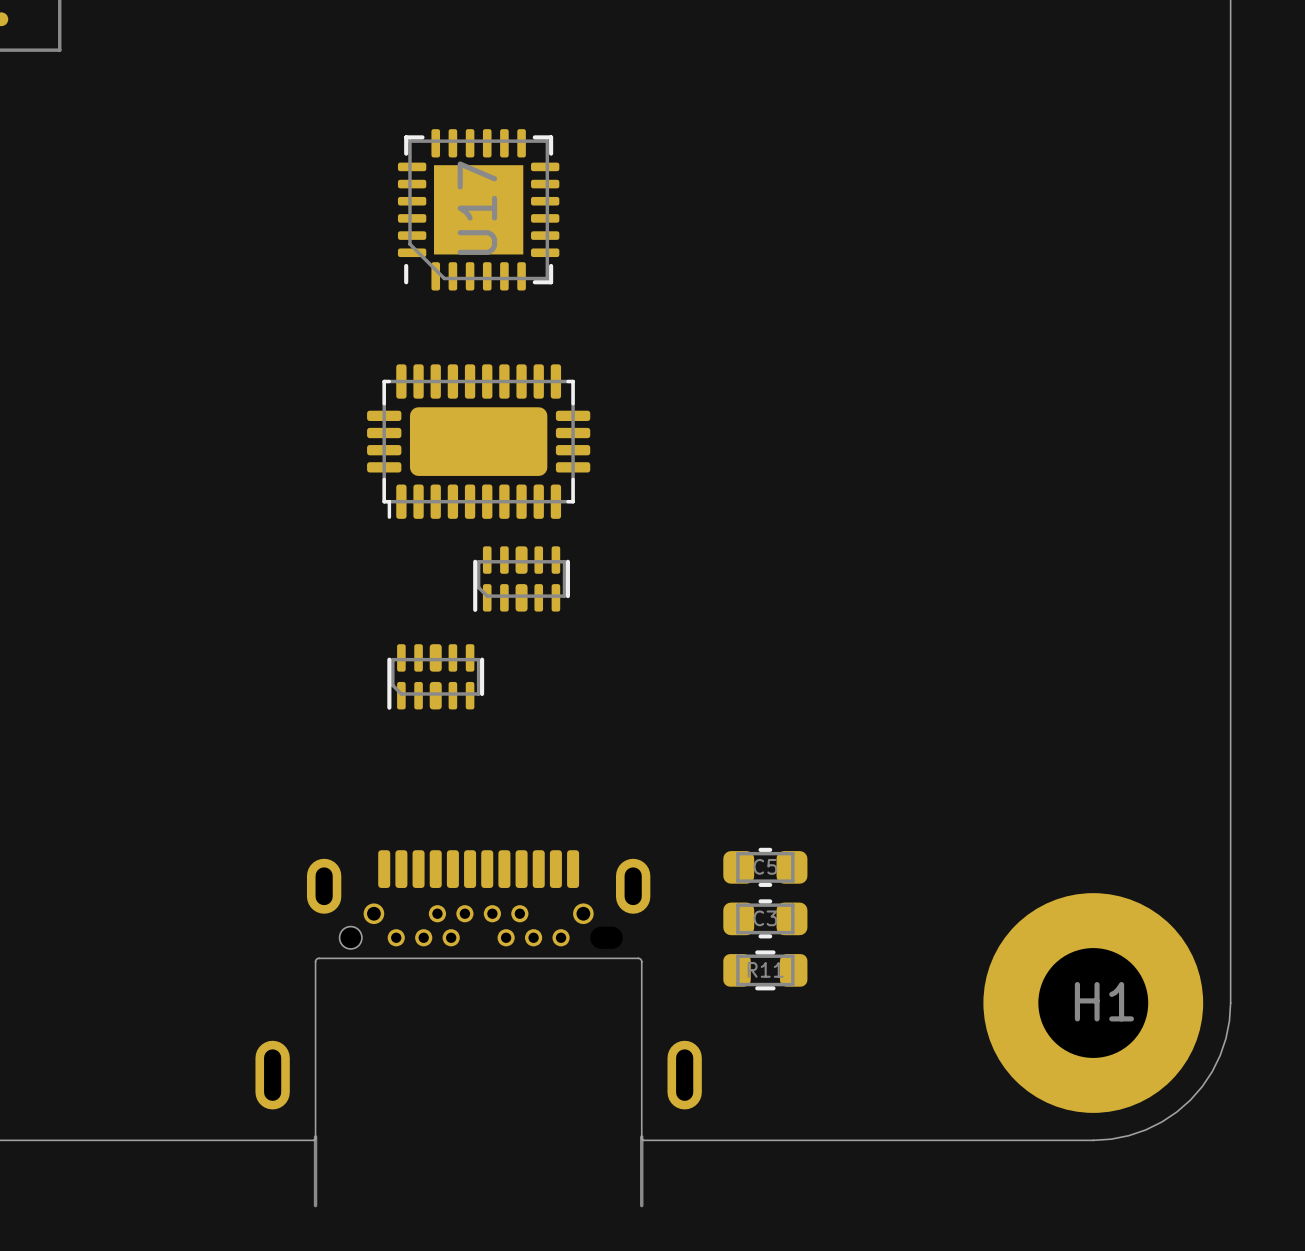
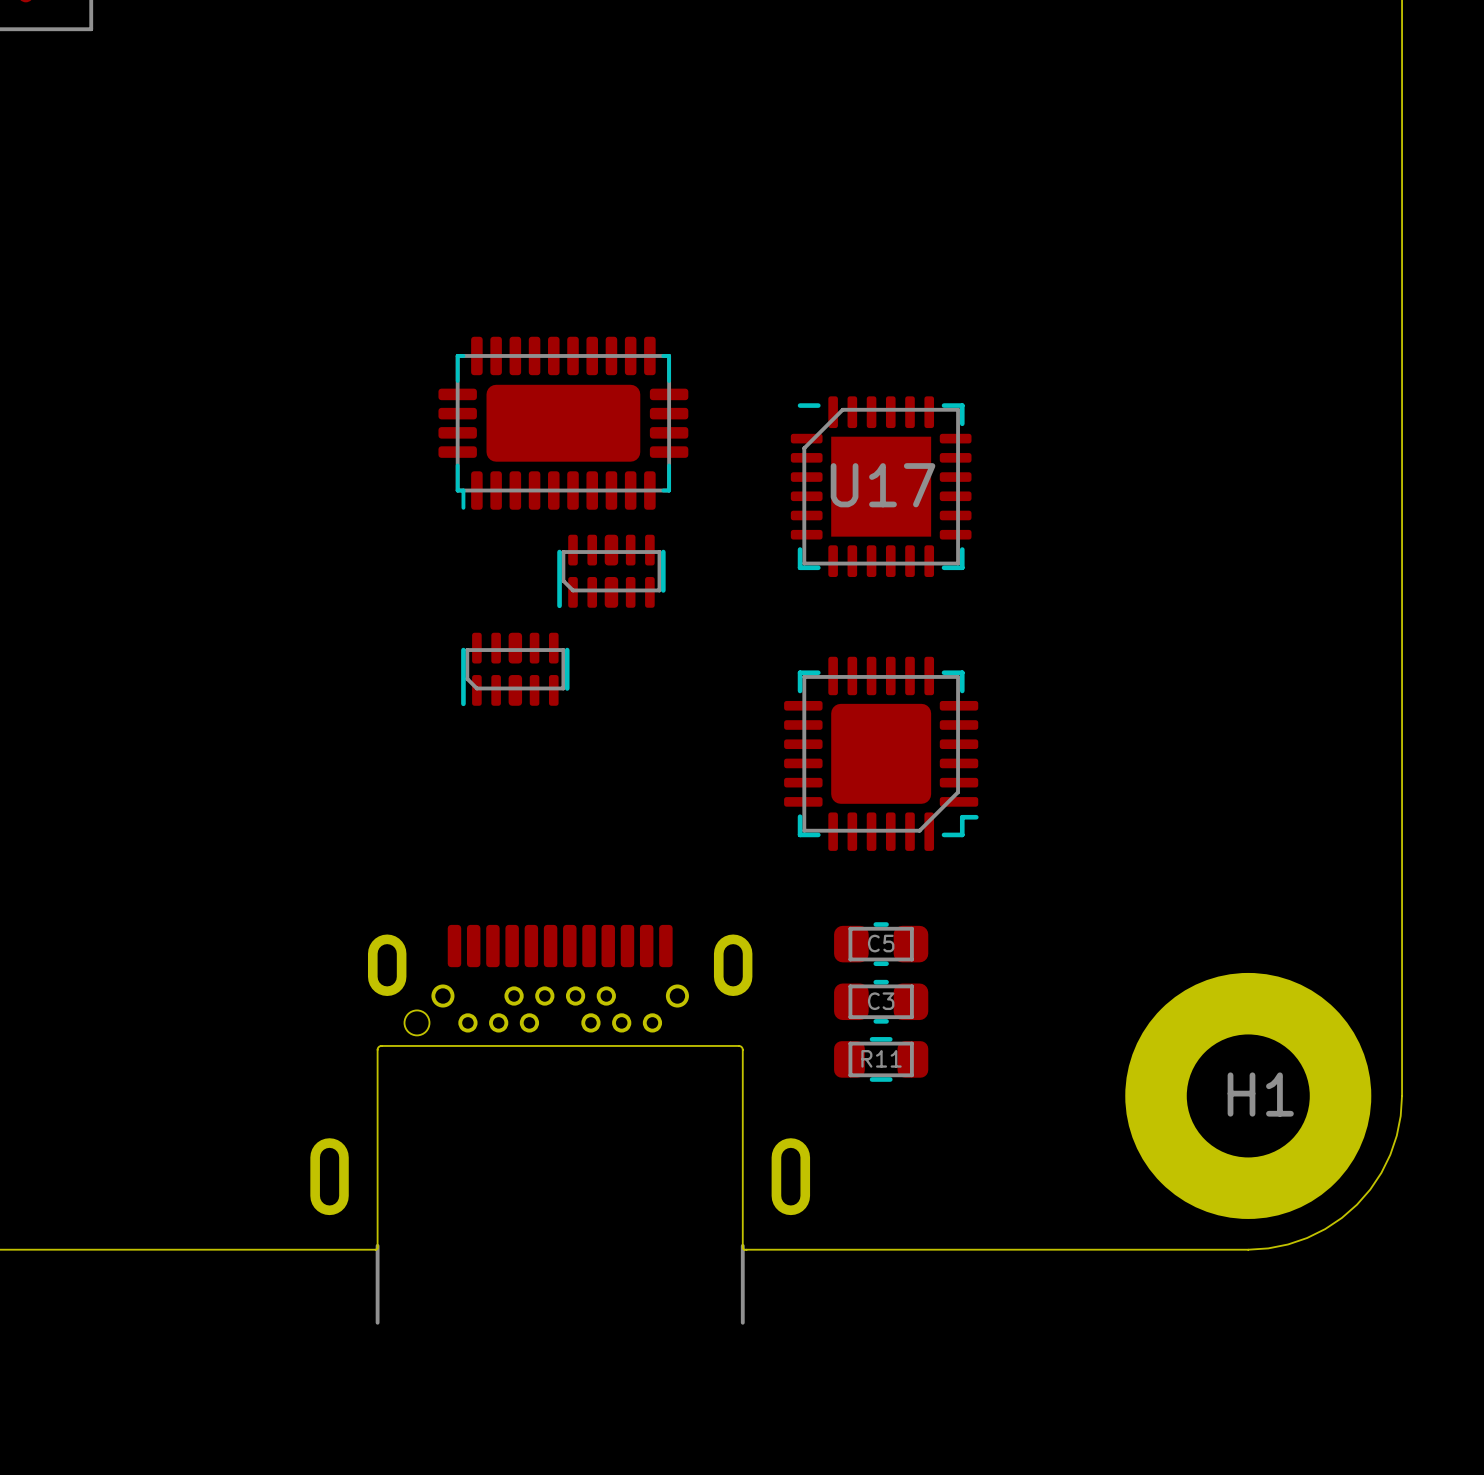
U17 rotation: 0° (478, 209) -> 90° clockwise (881, 486)
U17 position: (478, 209) -> (881, 486)
part position: (478, 441) -> (563, 423)
part position: (521, 579) -> (611, 571)
part: none -> (515, 669)
part: (435, 676) -> none
part: none -> (881, 753)

